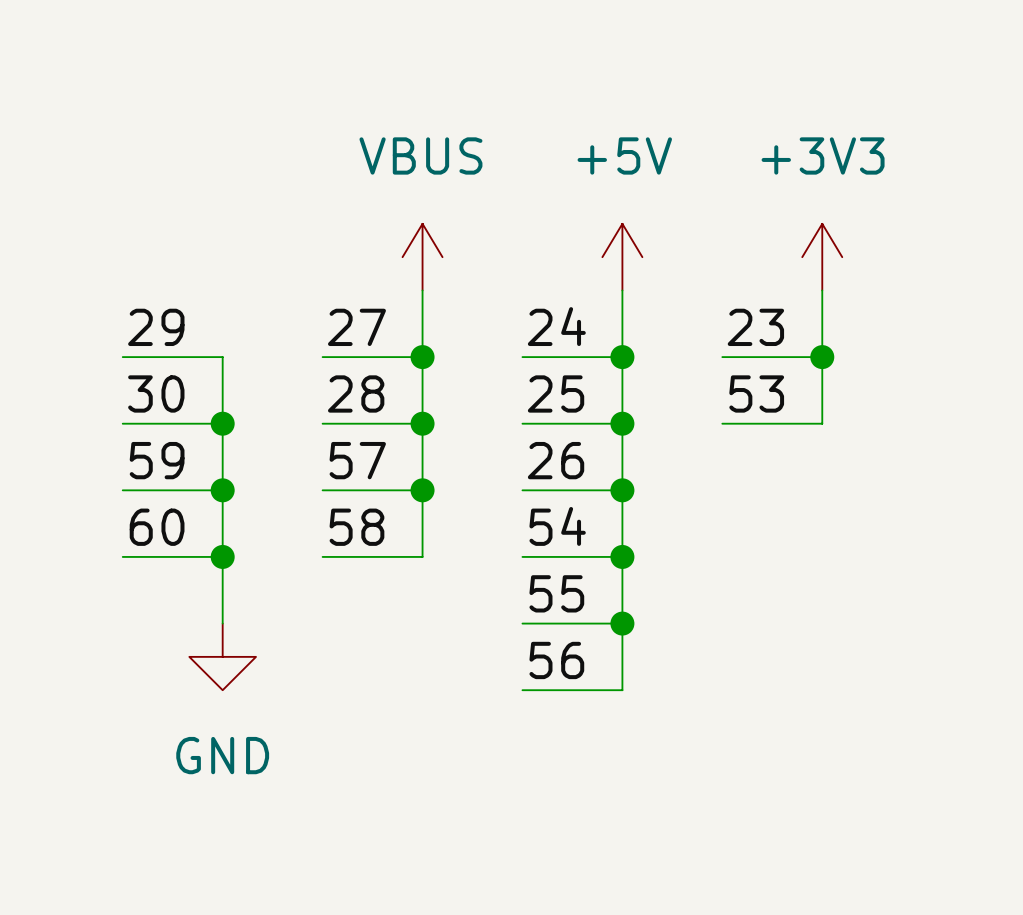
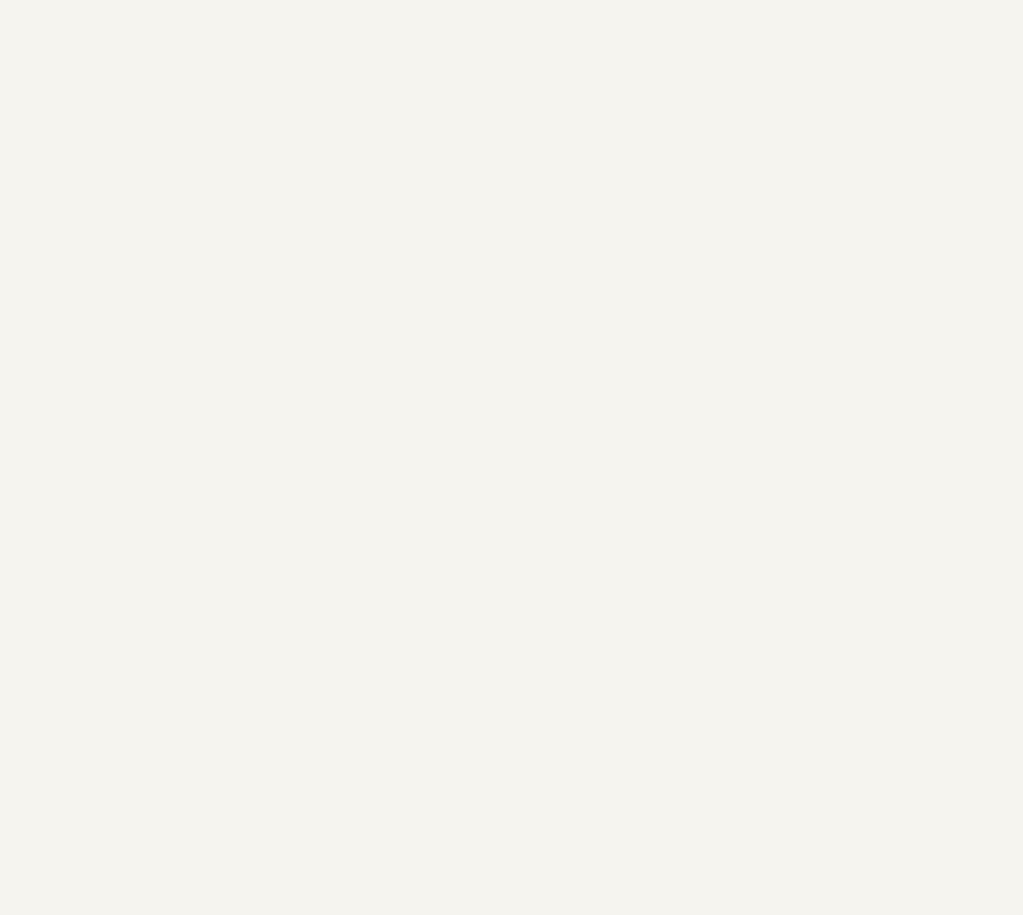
power symbol: VBUS (422, 257) -> none
power symbol: +5V (622, 257) -> none
power symbol: +3V3 (822, 257) -> none
wire: (422, 290) (422, 556) (322, 556) -> none
wire: (622, 290) (622, 690) (522, 690) -> none
wire: (822, 290) (822, 423) (722, 423) -> none
label: 24 (556, 326) -> none
label: 29 (156, 327) -> none
label: 27 (356, 327) -> none
label: 23 (755, 327) -> none
wire: (122, 357) (222, 357) (222, 623) -> none
wire: (322, 357) (422, 357) -> none
junction: (422, 357) -> none
wire: (522, 357) (622, 357) -> none
junction: (622, 357) -> none
wire: (722, 357) (822, 357) -> none
junction: (822, 357) -> none
label: 30 (156, 393) -> none
label: 28 (356, 393) -> none
label: 25 (556, 393) -> none
label: 53 (756, 393) -> none
wire: (122, 423) (222, 423) -> none
junction: (222, 423) -> none
wire: (322, 423) (422, 423) -> none
junction: (422, 423) -> none
wire: (522, 423) (622, 423) -> none
junction: (622, 423) -> none
label: 59 (157, 460) -> none
label: 57 (357, 460) -> none
label: 26 (556, 460) -> none
wire: (122, 490) (222, 490) -> none
junction: (222, 490) -> none
wire: (322, 490) (422, 490) -> none
junction: (422, 490) -> none
wire: (522, 490) (622, 490) -> none
junction: (622, 490) -> none
label: 54 (557, 526) -> none
label: 60 (157, 527) -> none
label: 58 (356, 527) -> none
wire: (122, 556) (222, 556) -> none
junction: (222, 556) -> none
wire: (522, 556) (622, 556) -> none
junction: (622, 556) -> none
label: 55 (556, 593) -> none
wire: (522, 623) (622, 623) -> none
junction: (622, 623) -> none
power symbol: GND (222, 656) -> none
label: 56 (556, 660) -> none

